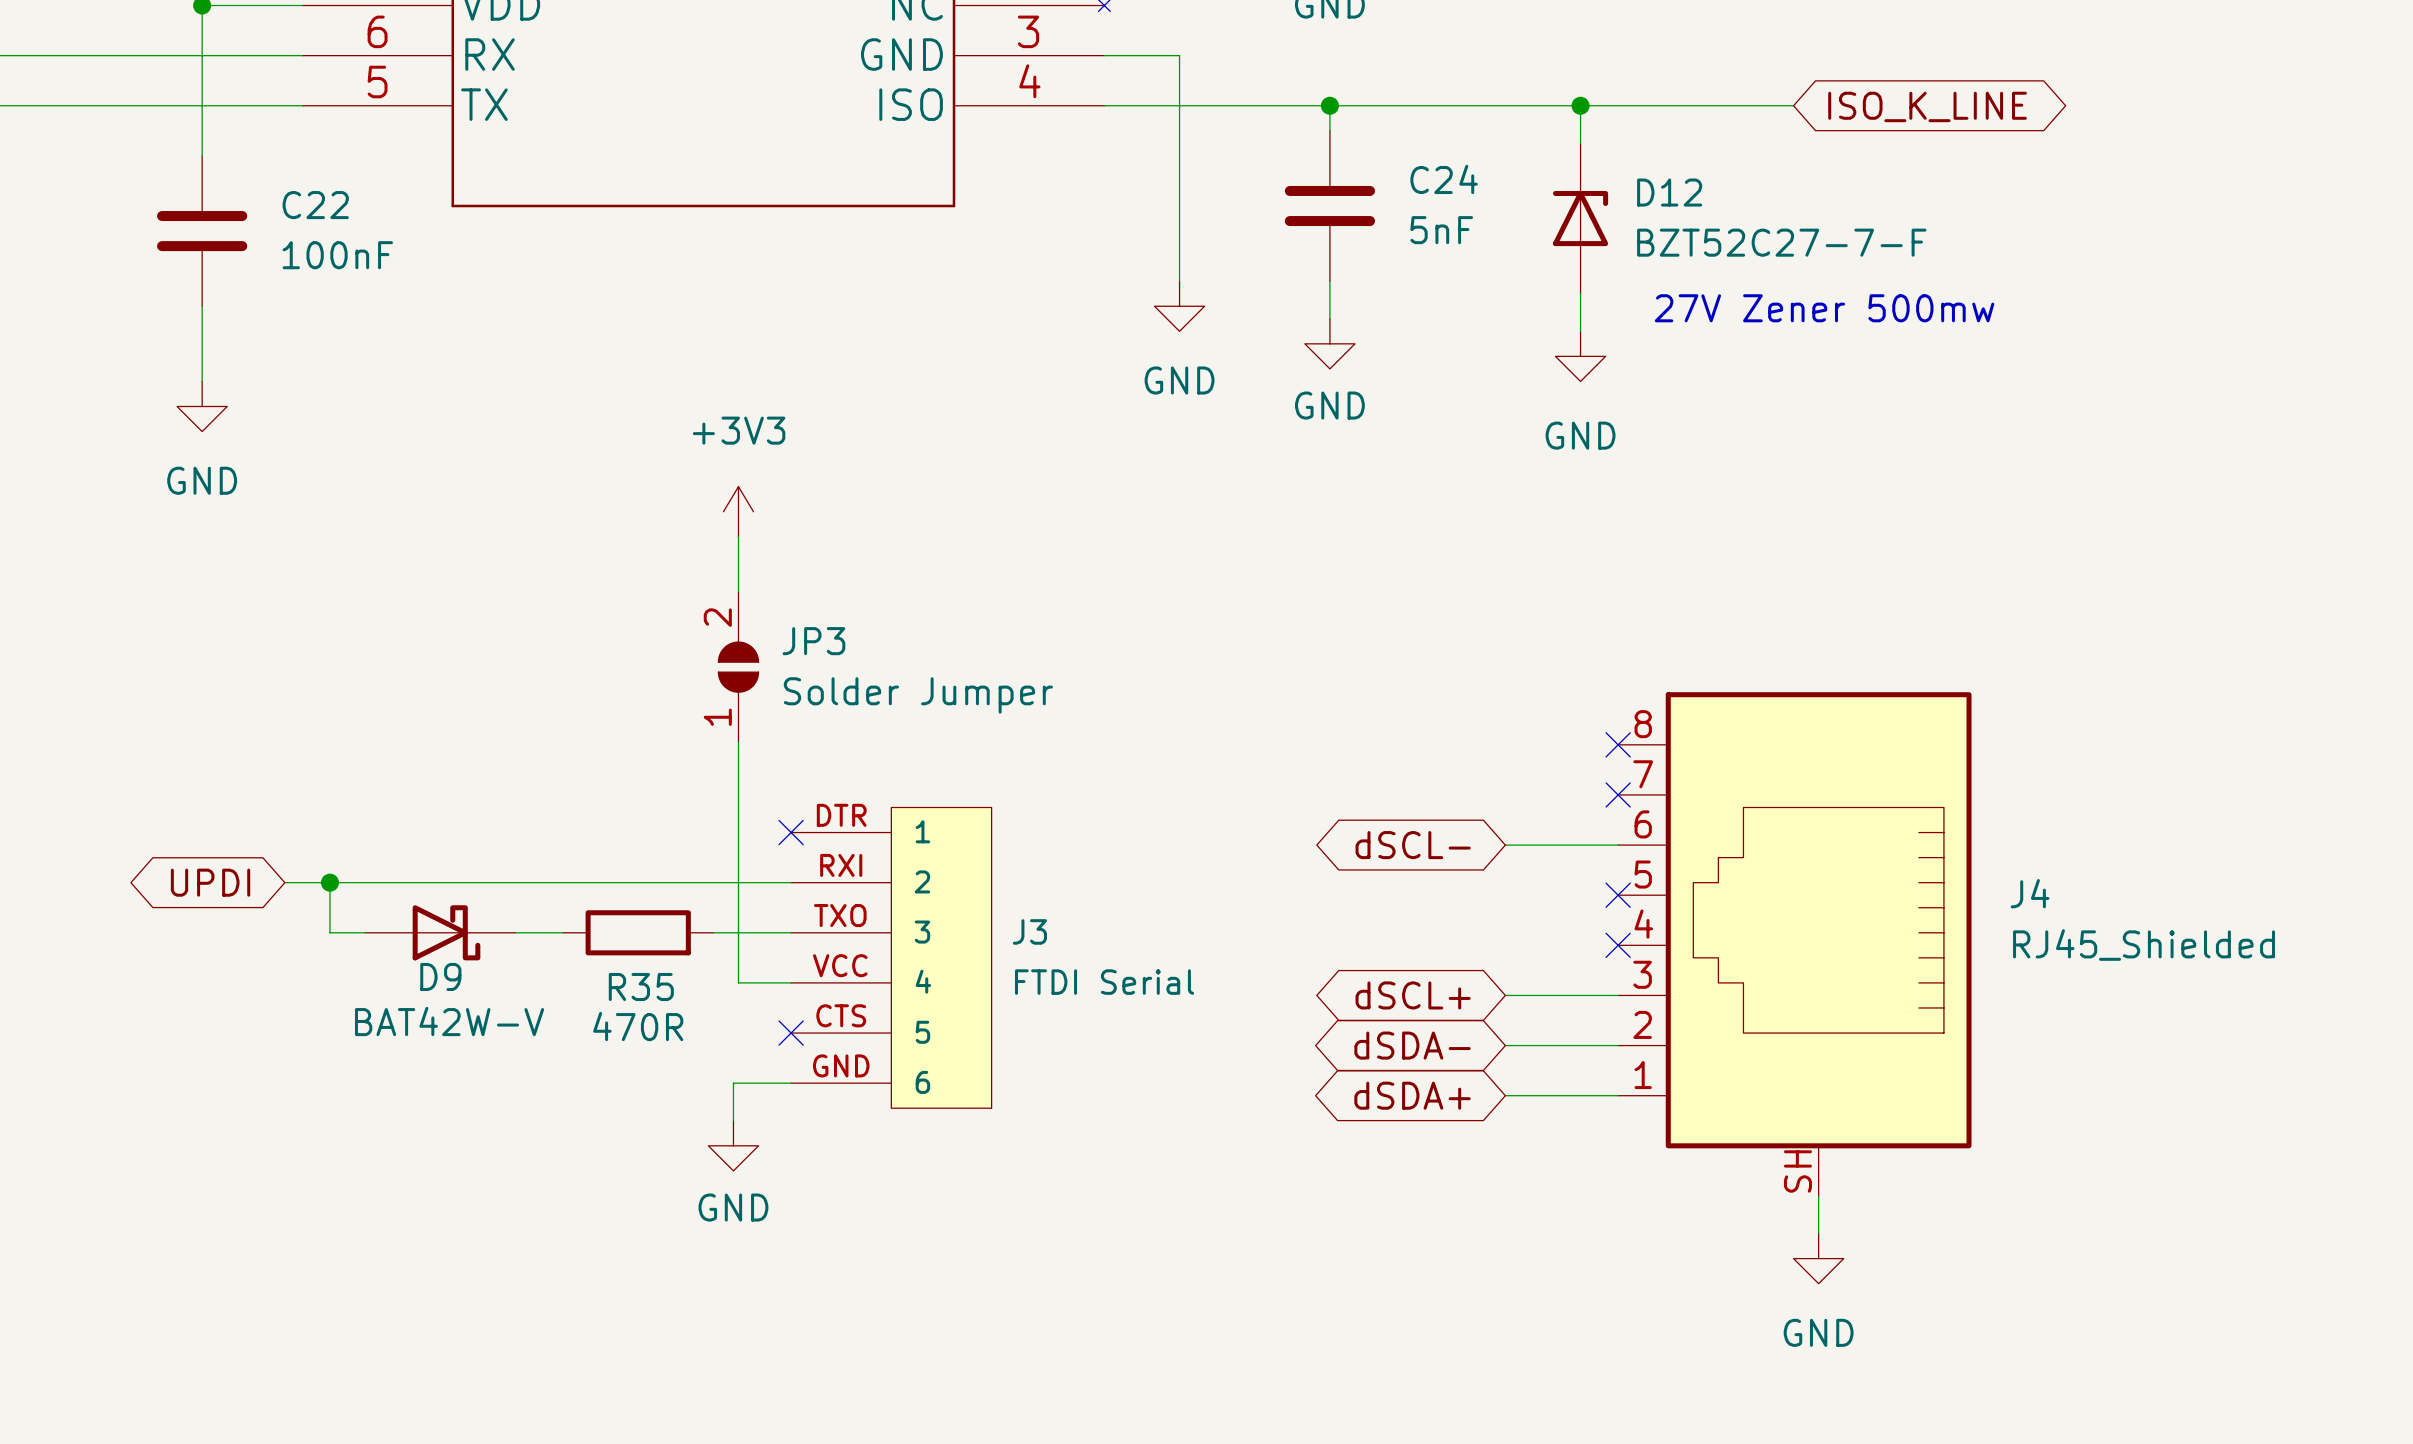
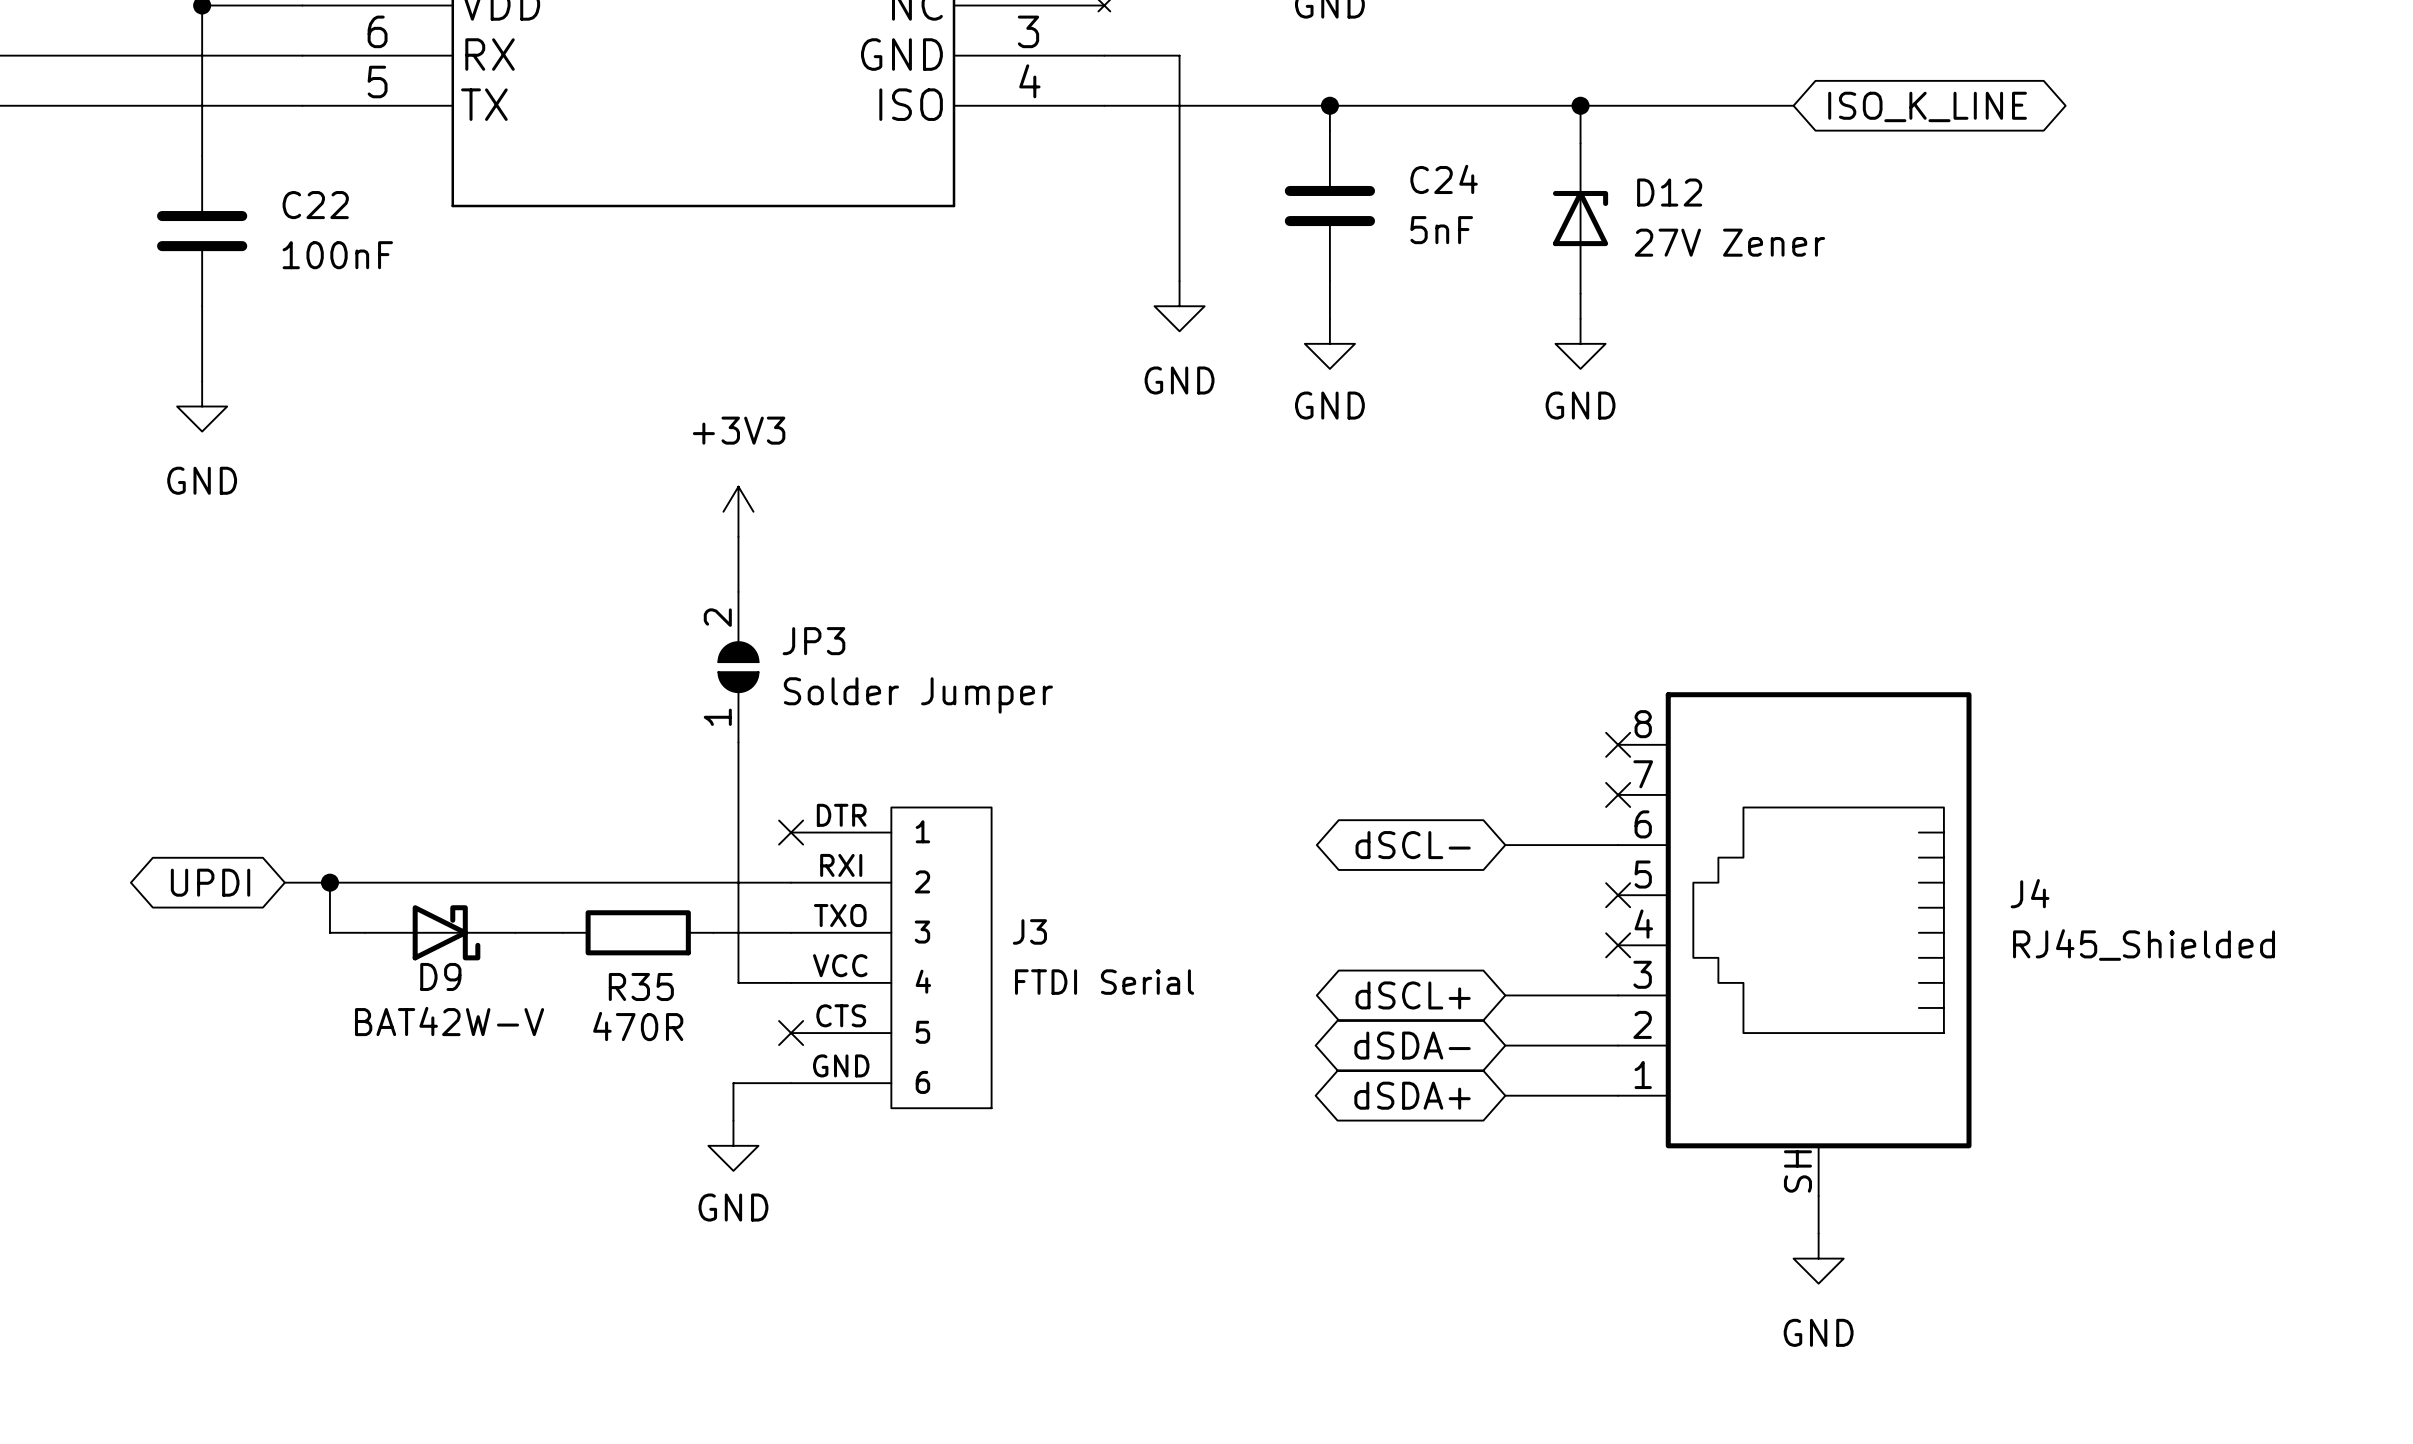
D12 value: BZT52C27-7-F (1781, 242) -> 27V Zener (1729, 242)
text: 27V Zener 500mw (1824, 308) -> none
power symbol position: GND (1580, 356) -> GND (1580, 343)
power symbol text position: GND (1580, 435) -> GND (1580, 405)

